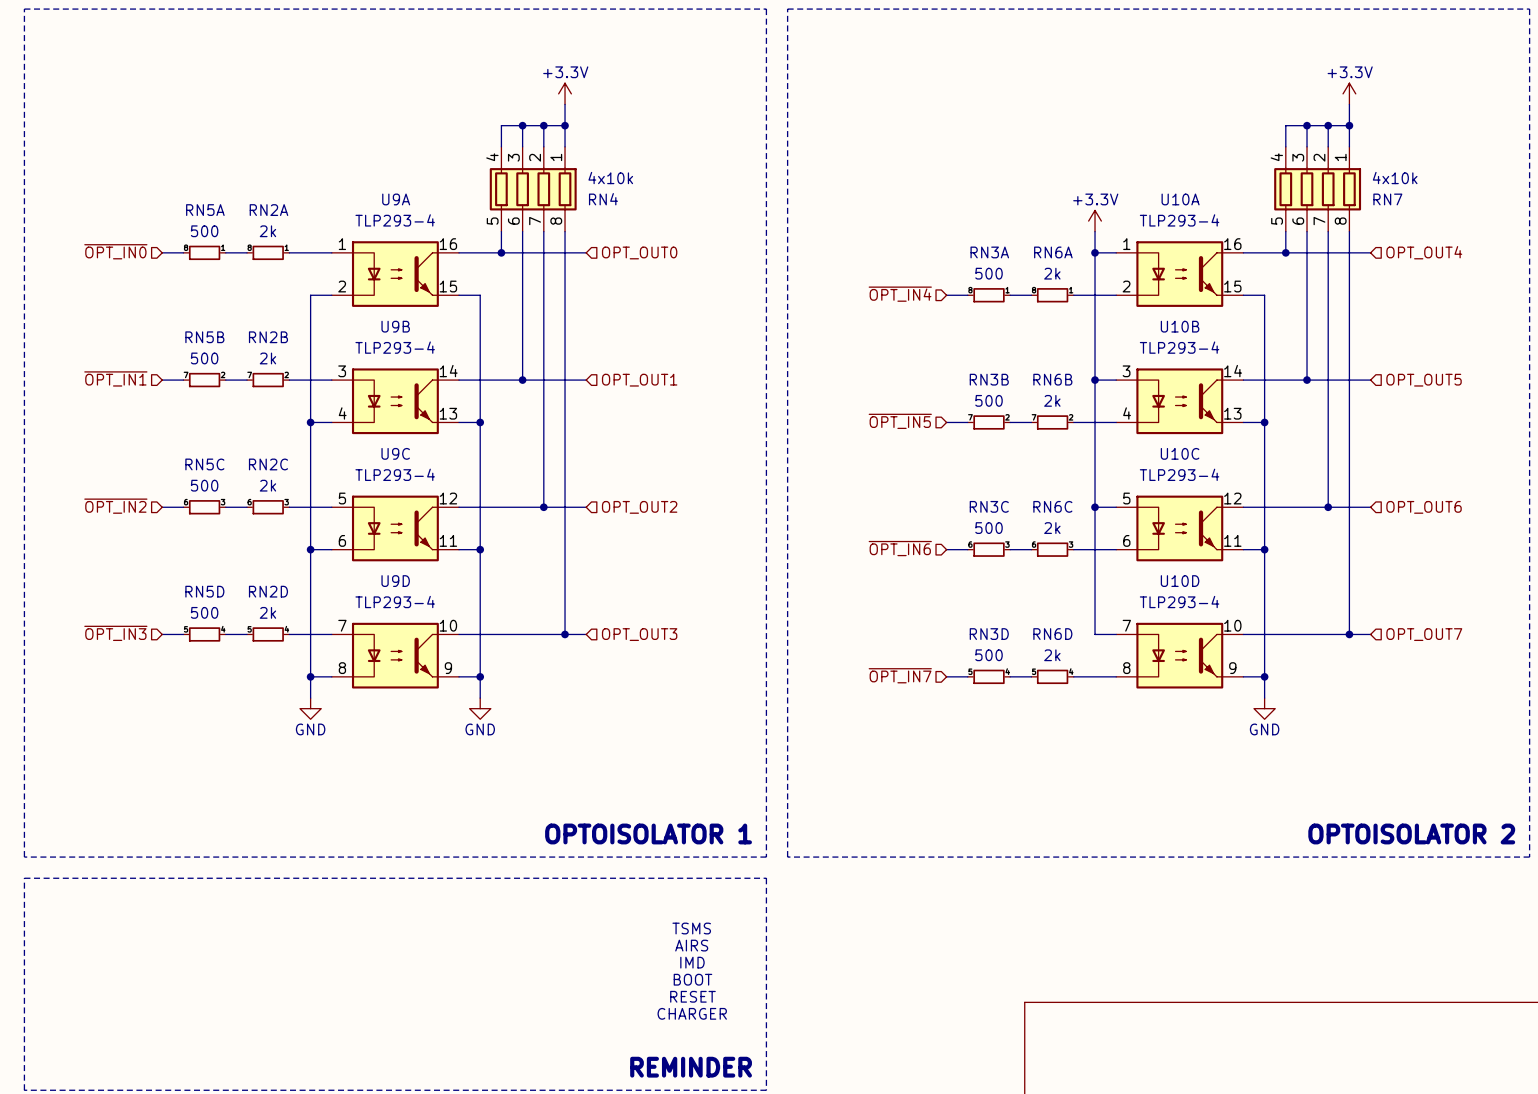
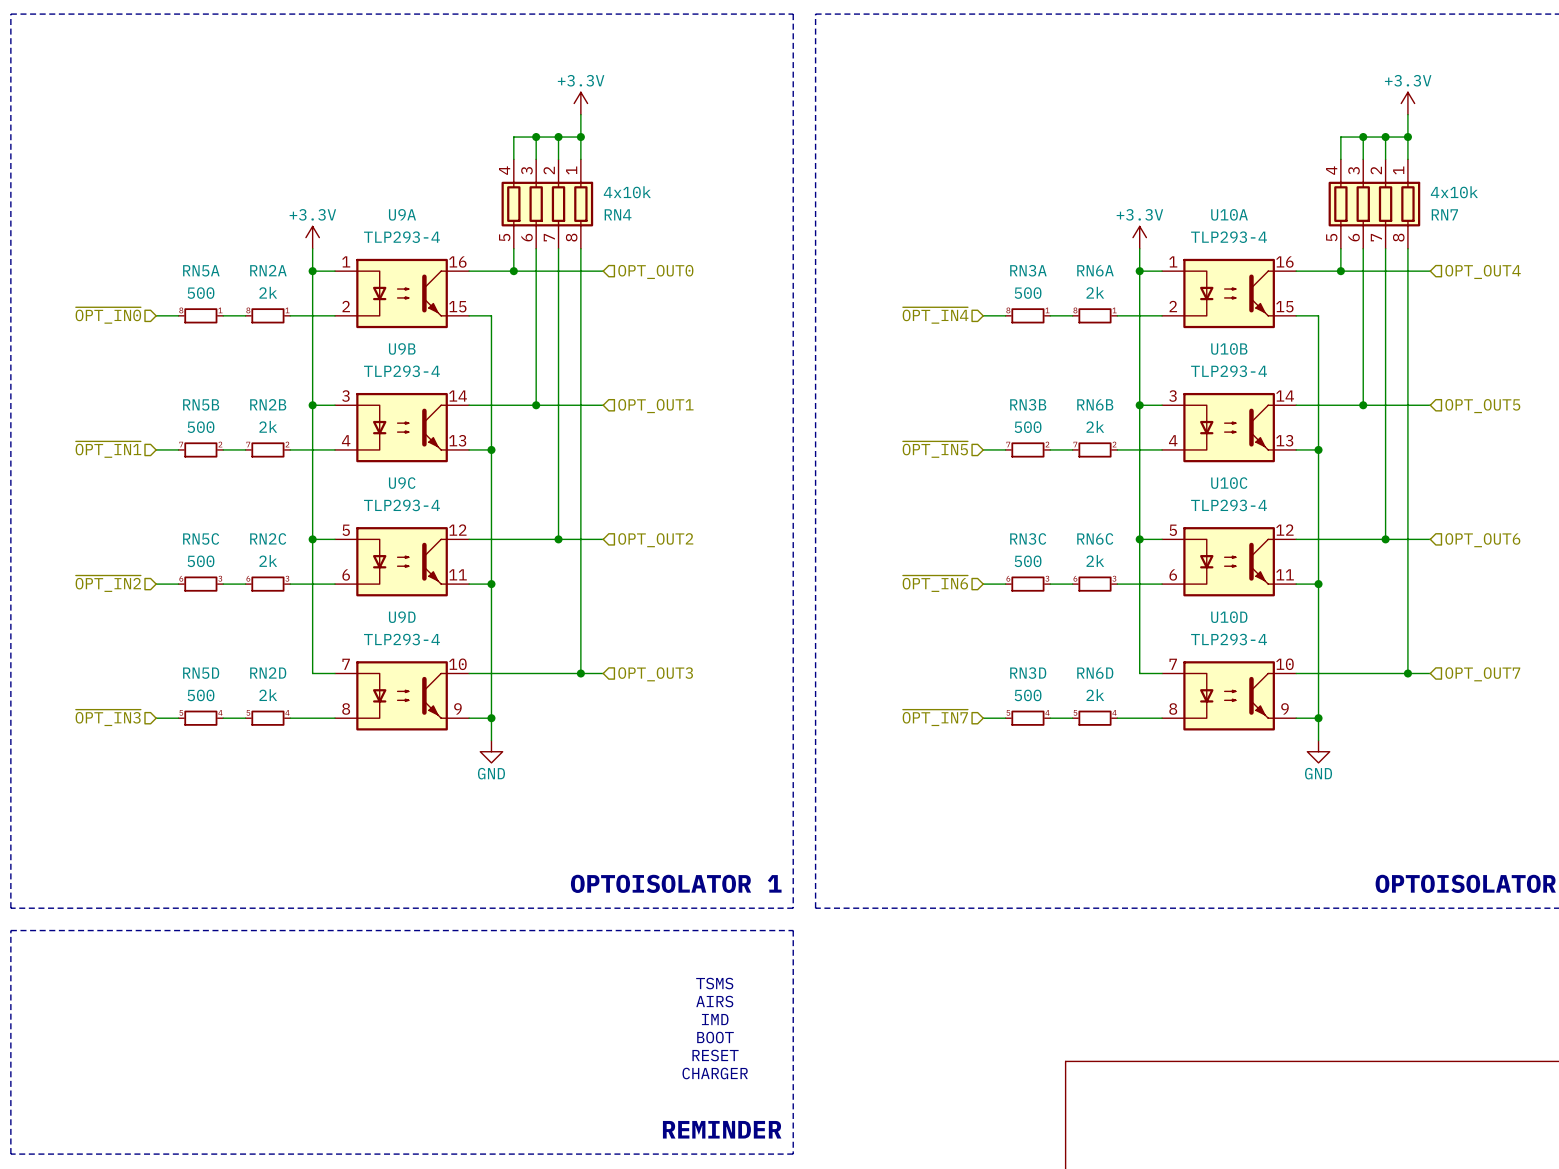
power symbol: none -> +3.3V (312, 237)
wire: none -> (312, 248) (312, 315) (290, 315)
hierarchical label position: ~{OPT_IN0} (115, 251) -> ~{OPT_IN0} (108, 315)
wire: (162, 252) (183, 252) -> (156, 315) (178, 315)
RN5A position: (204, 252) -> (200, 315)
wire: (225, 252) (247, 252) -> (223, 315) (245, 315)
RN2A position: (268, 252) -> (267, 315)
wire: (289, 252) (310, 252) -> none
junction: none -> (312, 271)
hierarchical label position: ~{OPT_IN1} (115, 378) -> ~{OPT_IN1} (108, 449)
wire: (162, 380) (183, 380) -> (156, 449) (178, 449)
RN5B position: (204, 380) -> (200, 449)
wire: (225, 380) (247, 380) -> (223, 449) (245, 449)
RN2B position: (268, 380) -> (267, 449)
wire: (289, 380) (310, 380) -> (290, 449) (312, 449)
junction: none -> (312, 405)
junction: (310, 422) -> none
hierarchical label position: ~{OPT_IN2} (115, 506) -> ~{OPT_IN2} (108, 583)
wire: (162, 507) (183, 507) -> (156, 584) (178, 584)
RN5C position: (204, 507) -> (200, 584)
wire: (225, 507) (247, 507) -> (223, 584) (245, 584)
RN2C position: (268, 507) -> (267, 584)
wire: (289, 507) (310, 507) -> (290, 584) (312, 584)
junction: none -> (312, 539)
junction: (310, 549) -> none
hierarchical label position: ~{OPT_IN3} (115, 633) -> ~{OPT_IN3} (108, 717)
wire: (162, 634) (183, 634) -> (156, 718) (178, 718)
RN5D position: (204, 634) -> (200, 718)
wire: (225, 634) (247, 634) -> (223, 718) (245, 718)
RN2D position: (268, 634) -> (267, 718)
wire: (289, 634) (310, 634) (310, 698) -> none
wire: none -> (290, 718) (312, 718)
junction: (310, 676) -> none
power symbol: GND (310, 708) -> none

